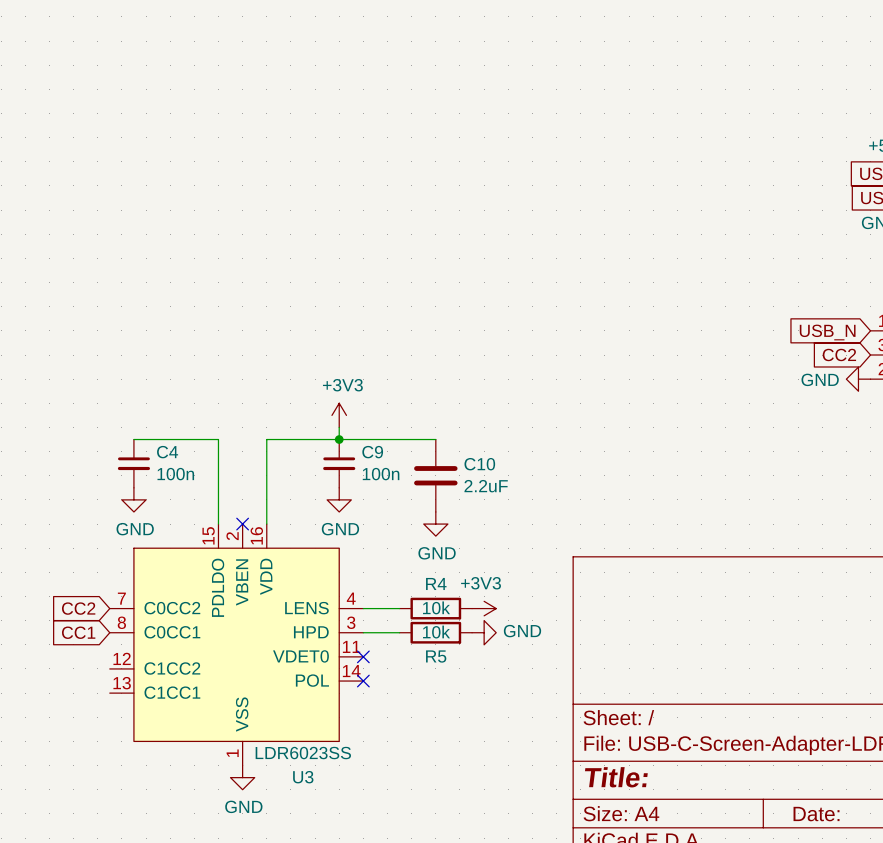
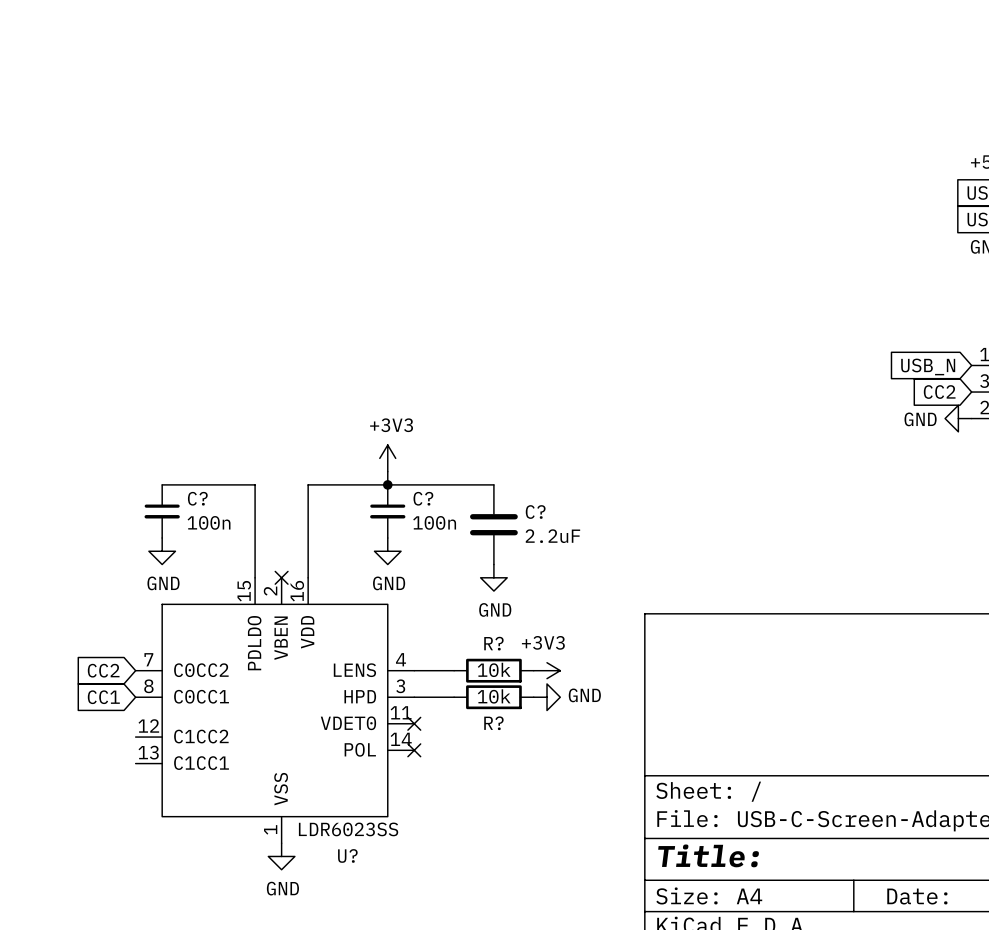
C4 name: C4 (167, 452) -> C? (197, 498)
C9 name: C9 (372, 452) -> C? (423, 498)
C10 name: C10 (479, 464) -> C? (535, 512)
R4 name: R4 (436, 583) -> R? (493, 643)
R5 name: R5 (436, 656) -> R? (493, 723)
U3 name: U3 (303, 777) -> U? (347, 855)

